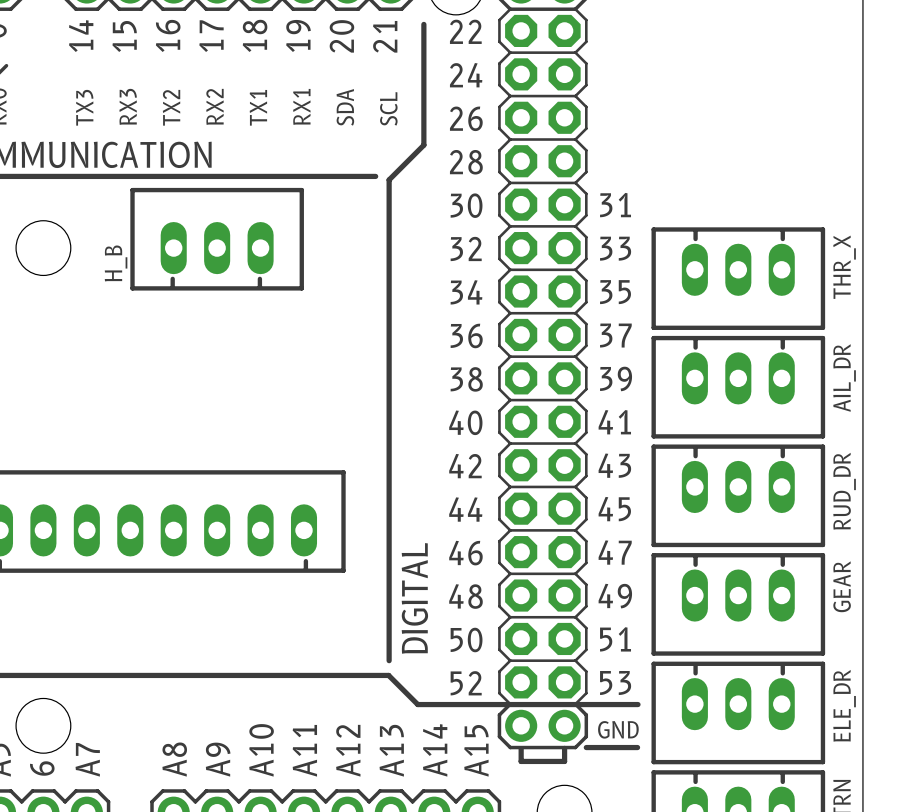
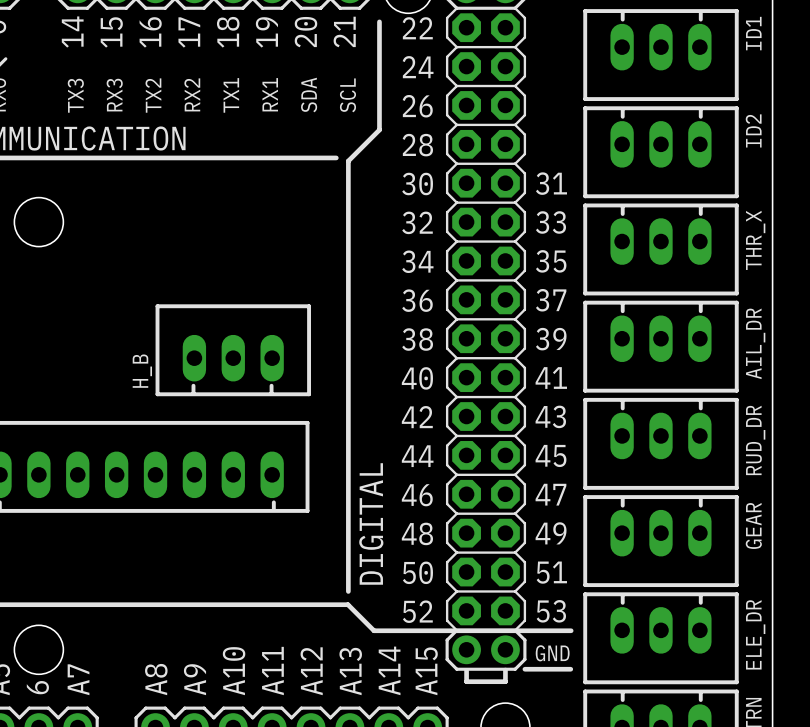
ID1: none -> (660, 55)
ID2: none -> (660, 152)
H_B position: (217, 239) -> (233, 350)

